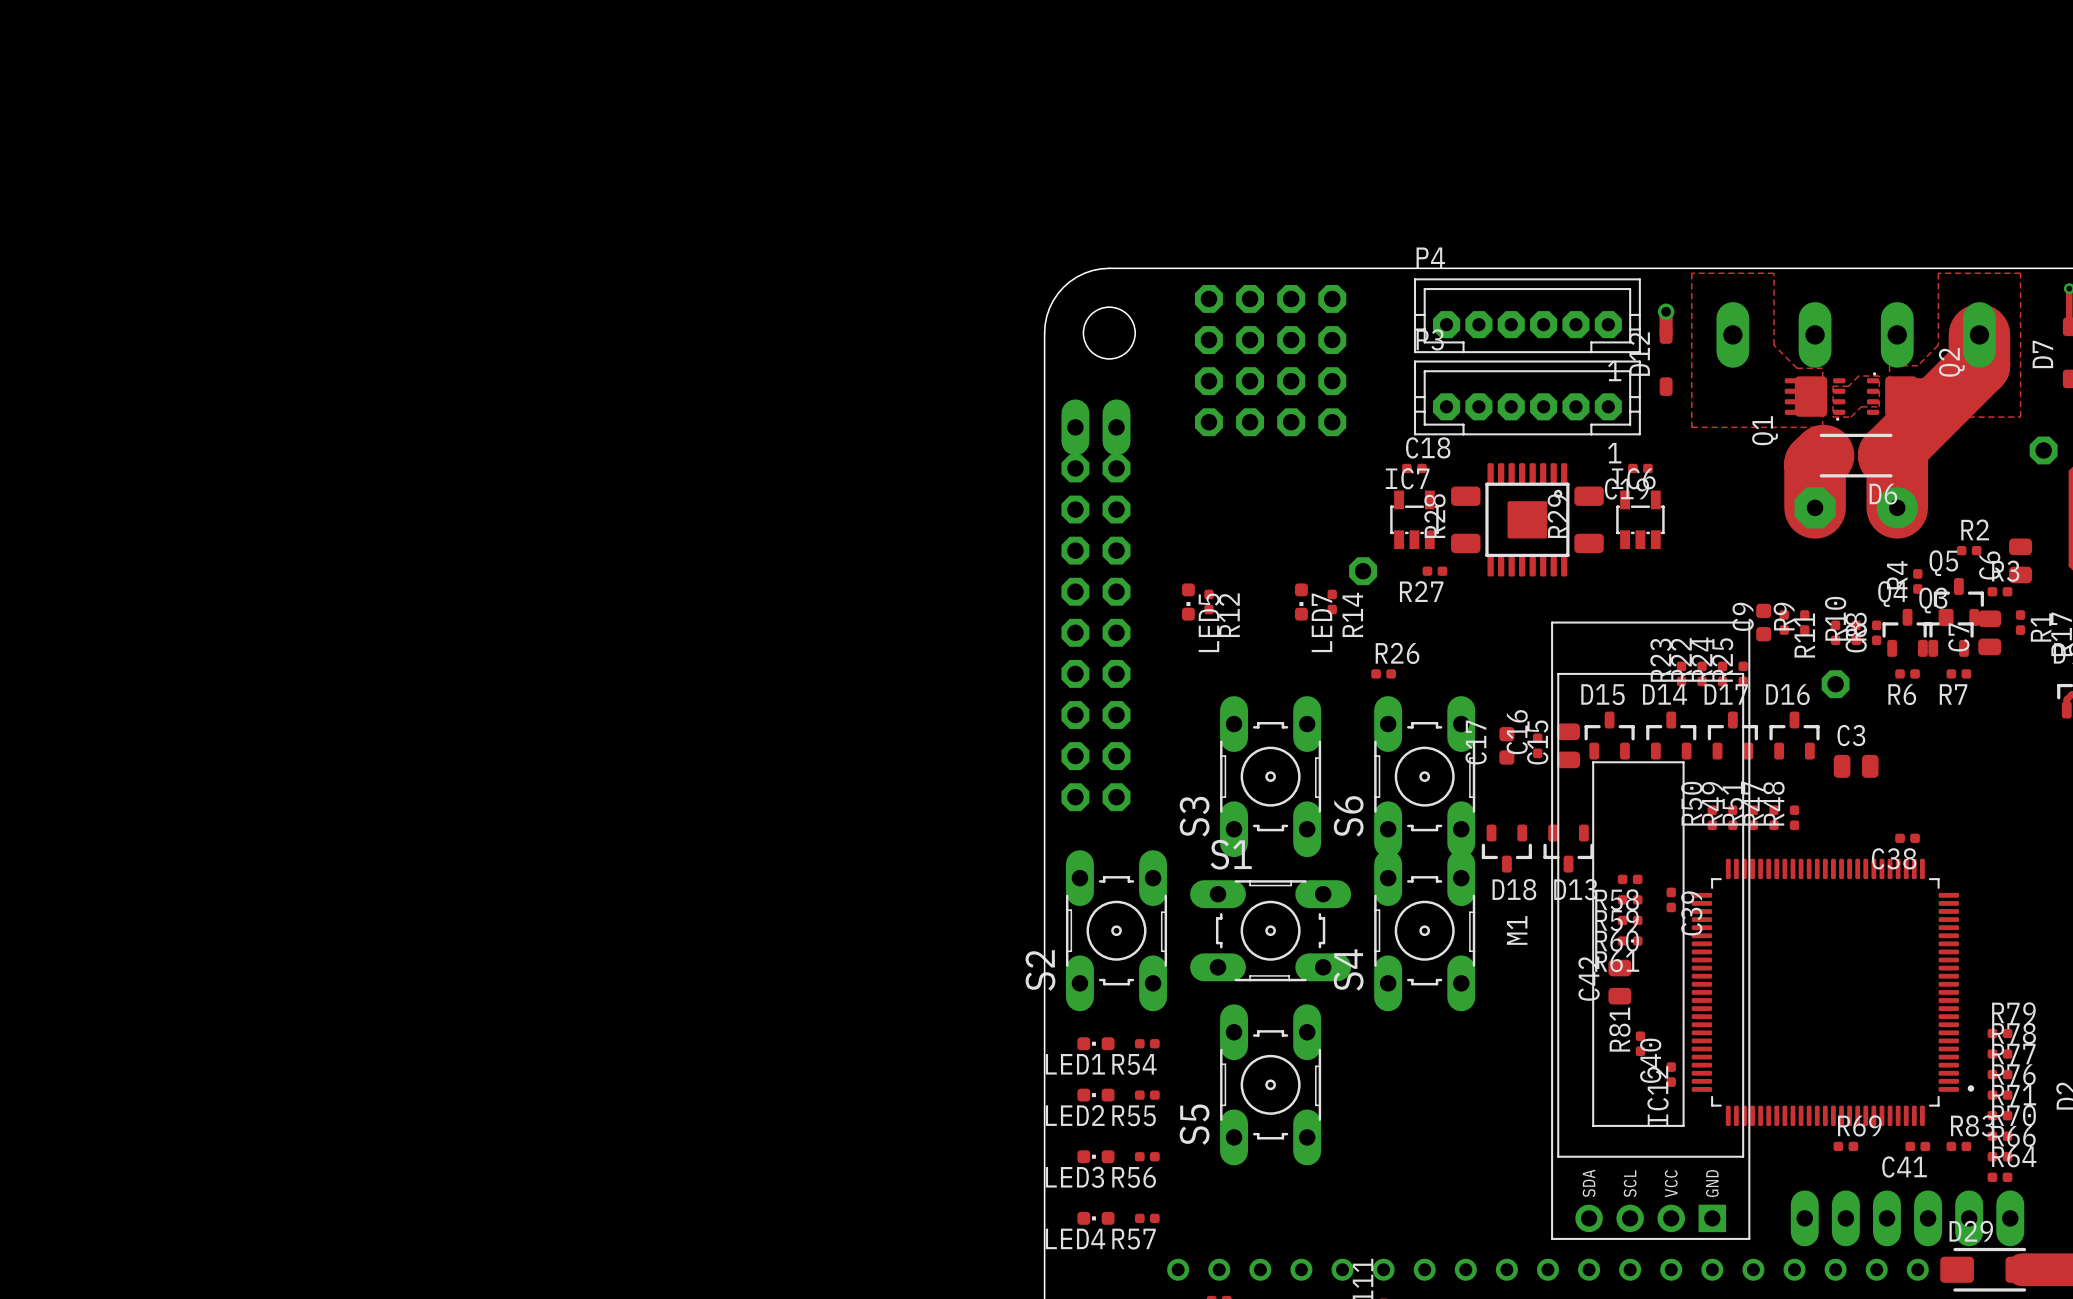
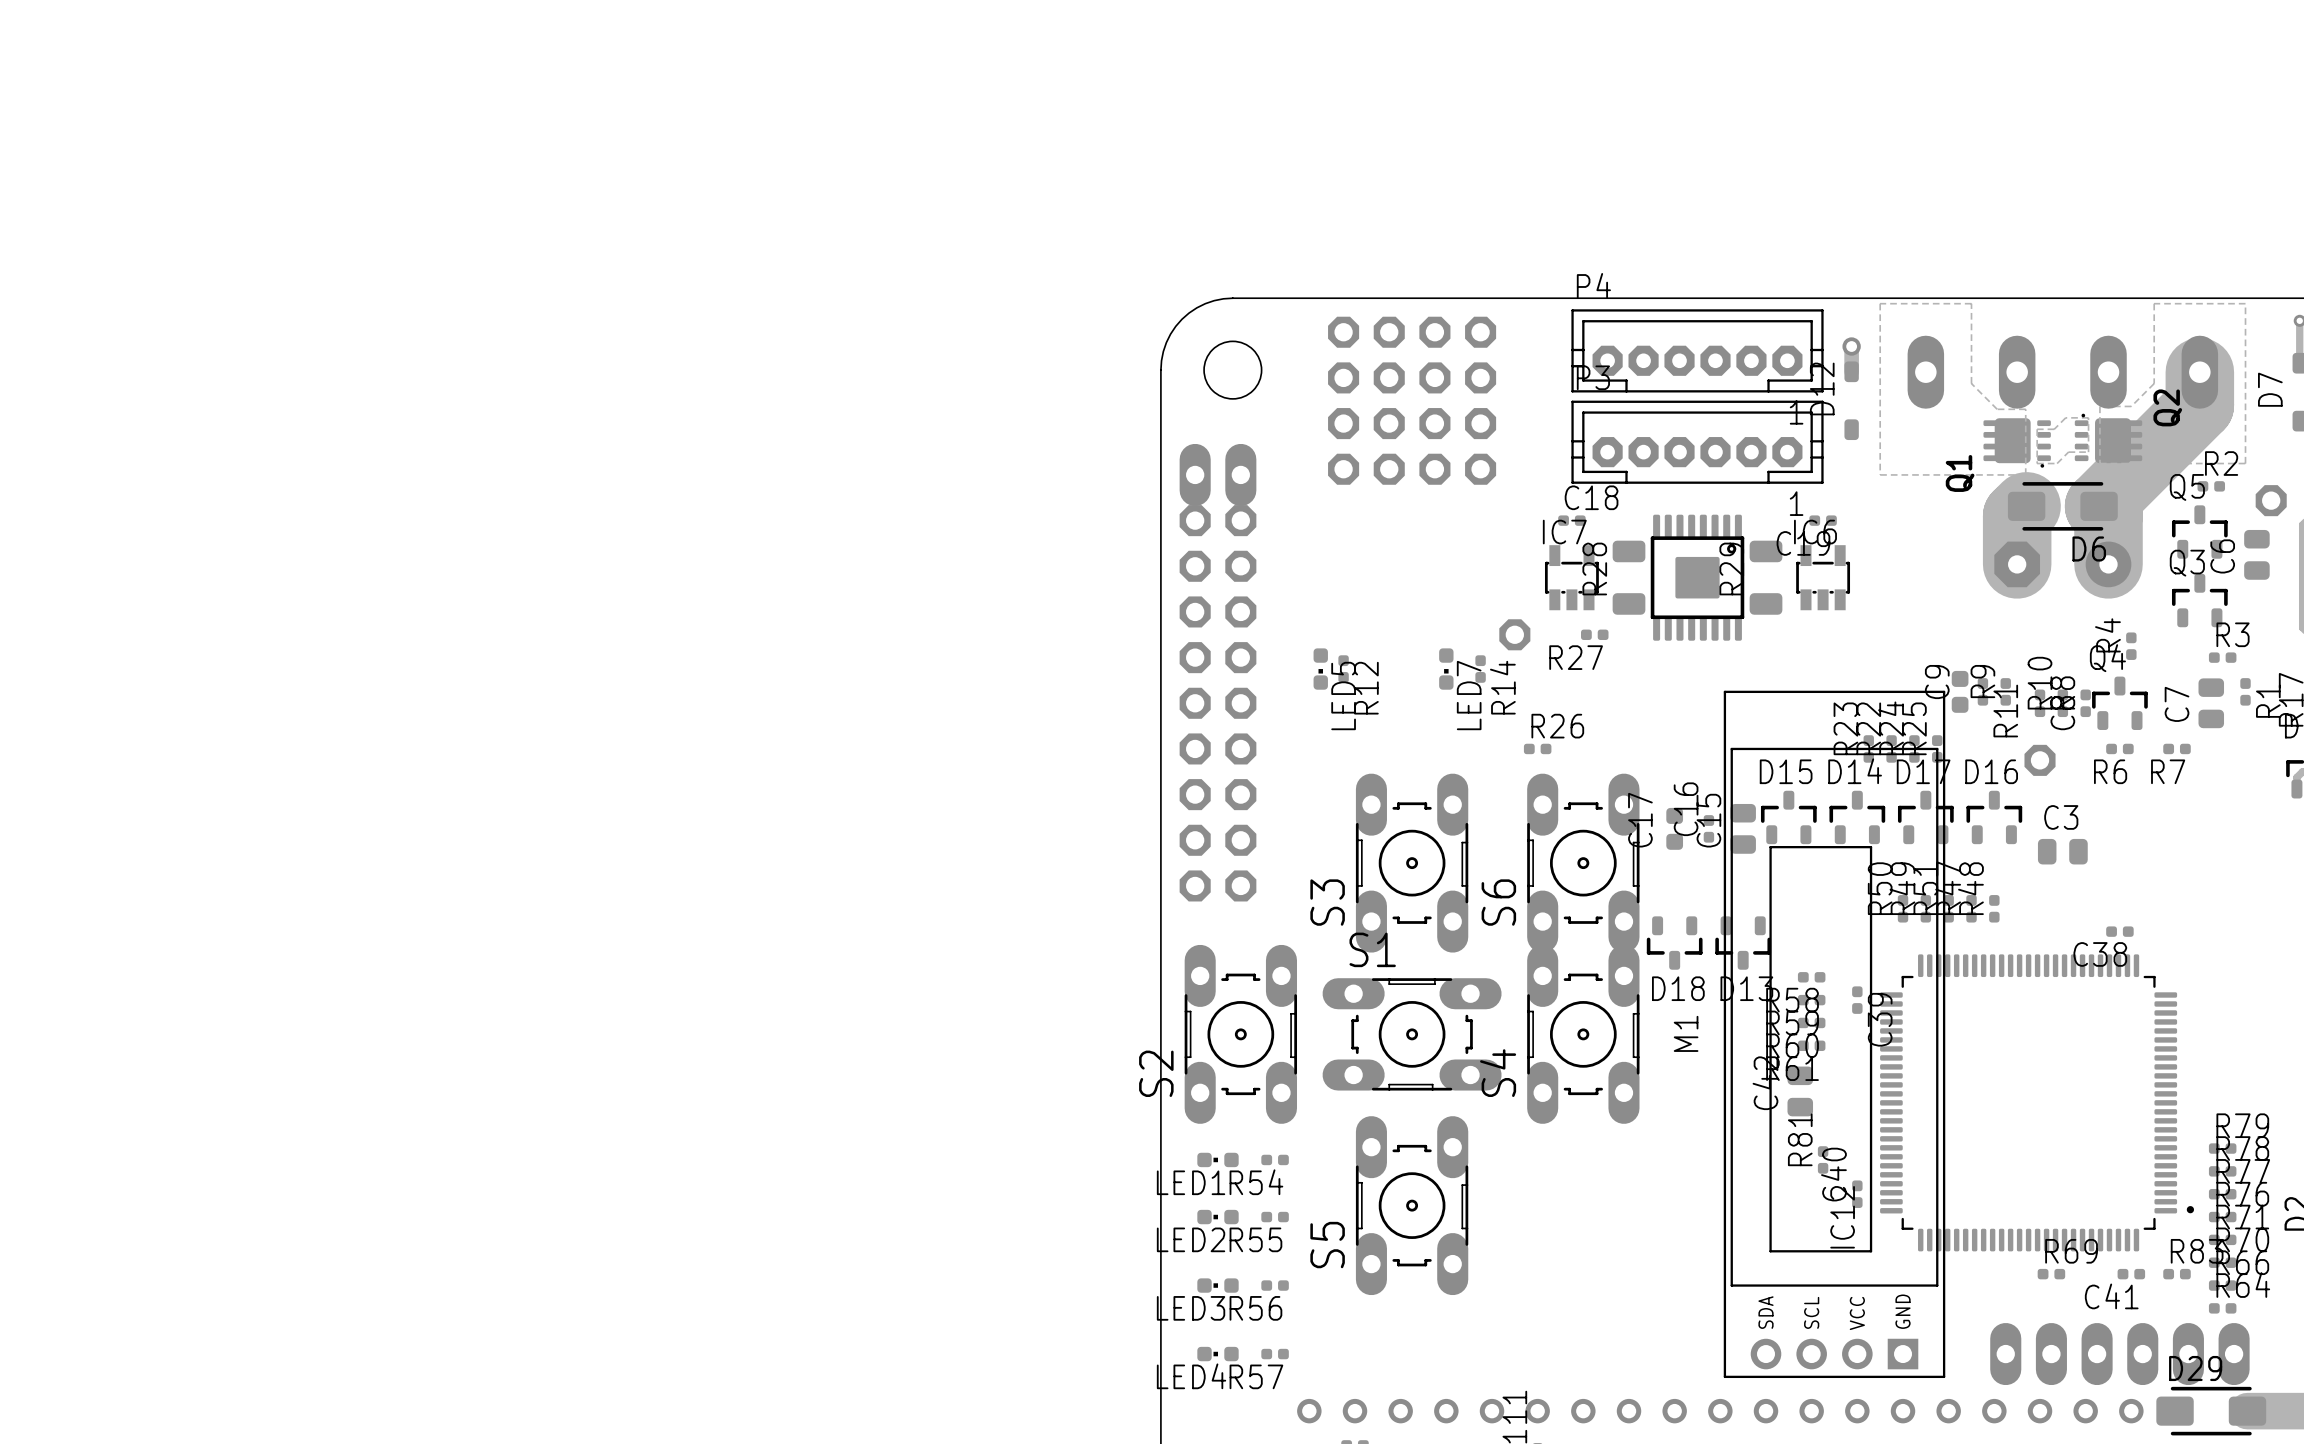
R2 position: (1969, 550) -> (2211, 486)
C6 position: (2020, 560) -> (2256, 554)
Q5 position: (1958, 602) -> (2199, 532)
Q3 position: (1948, 632) -> (2199, 600)

